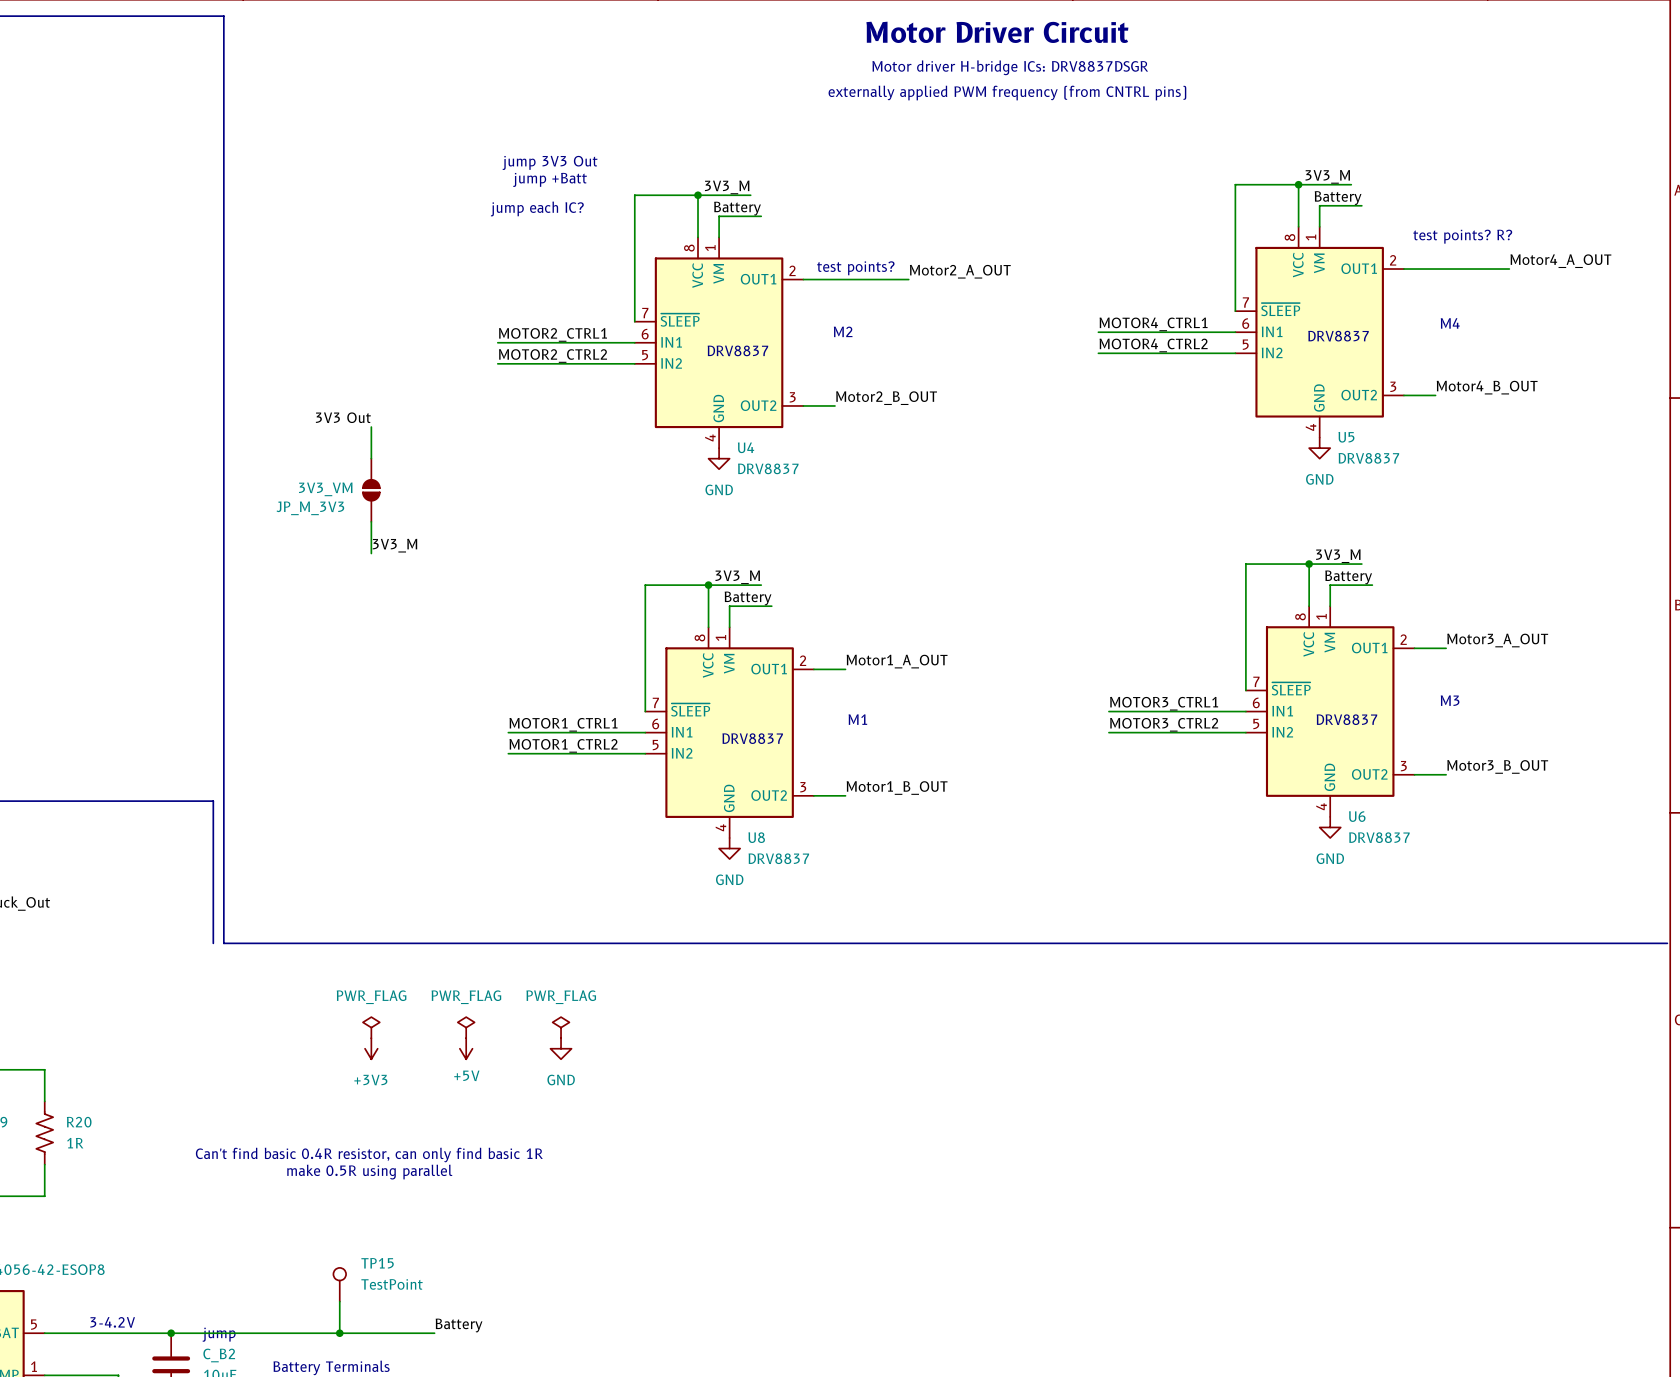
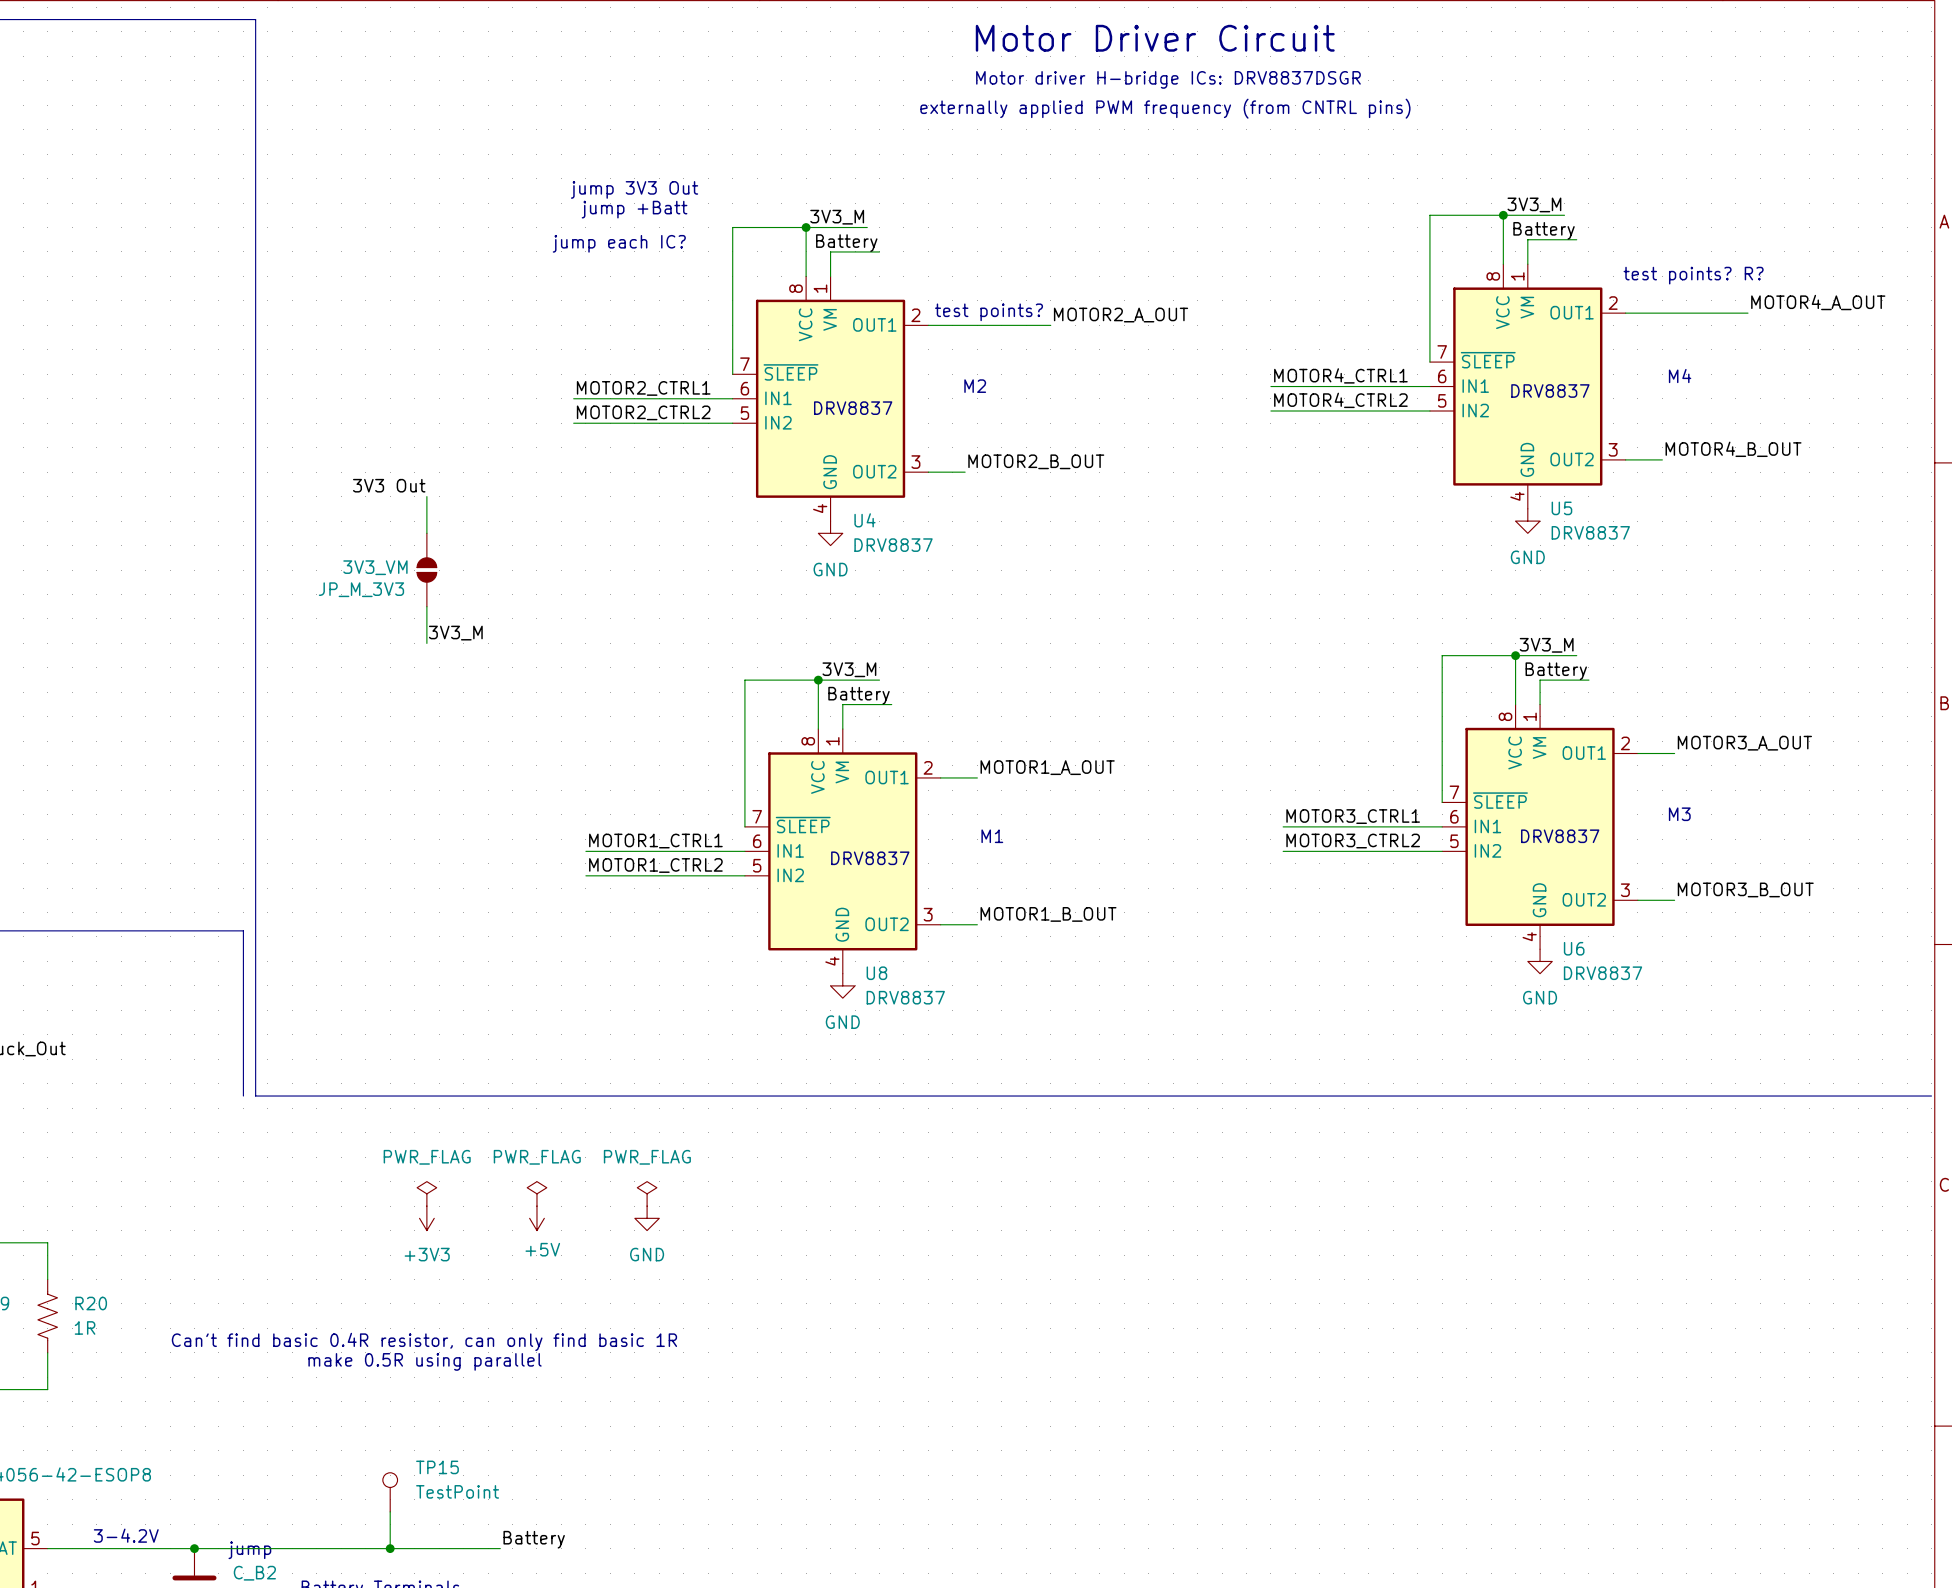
label: Motor4_A_OUT (1560, 261) -> MOTOR4_A_OUT (1818, 302)
label: Motor2_A_OUT (960, 271) -> MOTOR2_A_OUT (1121, 315)
label: Motor4_B_OUT (1487, 387) -> MOTOR4_B_OUT (1733, 449)
label: Motor2_B_OUT (886, 398) -> MOTOR2_B_OUT (1036, 461)
label: Motor3_A_OUT (1497, 640) -> MOTOR3_A_OUT (1744, 743)
label: Motor1_A_OUT (897, 661) -> MOTOR1_A_OUT (1047, 767)
label: Motor3_B_OUT (1497, 766) -> MOTOR3_B_OUT (1745, 889)
label: Motor1_B_OUT (897, 788) -> MOTOR1_B_OUT (1048, 914)

